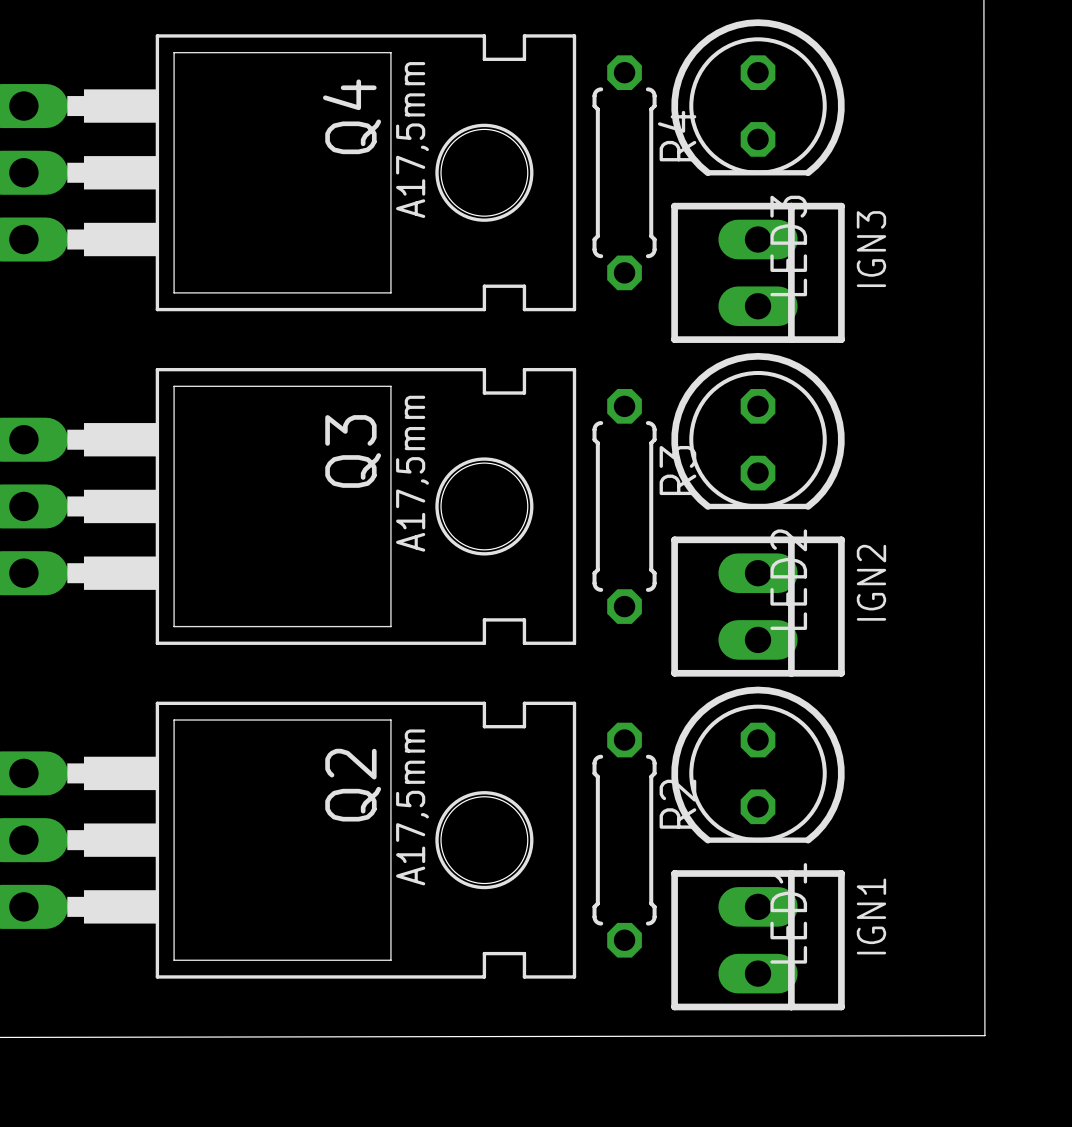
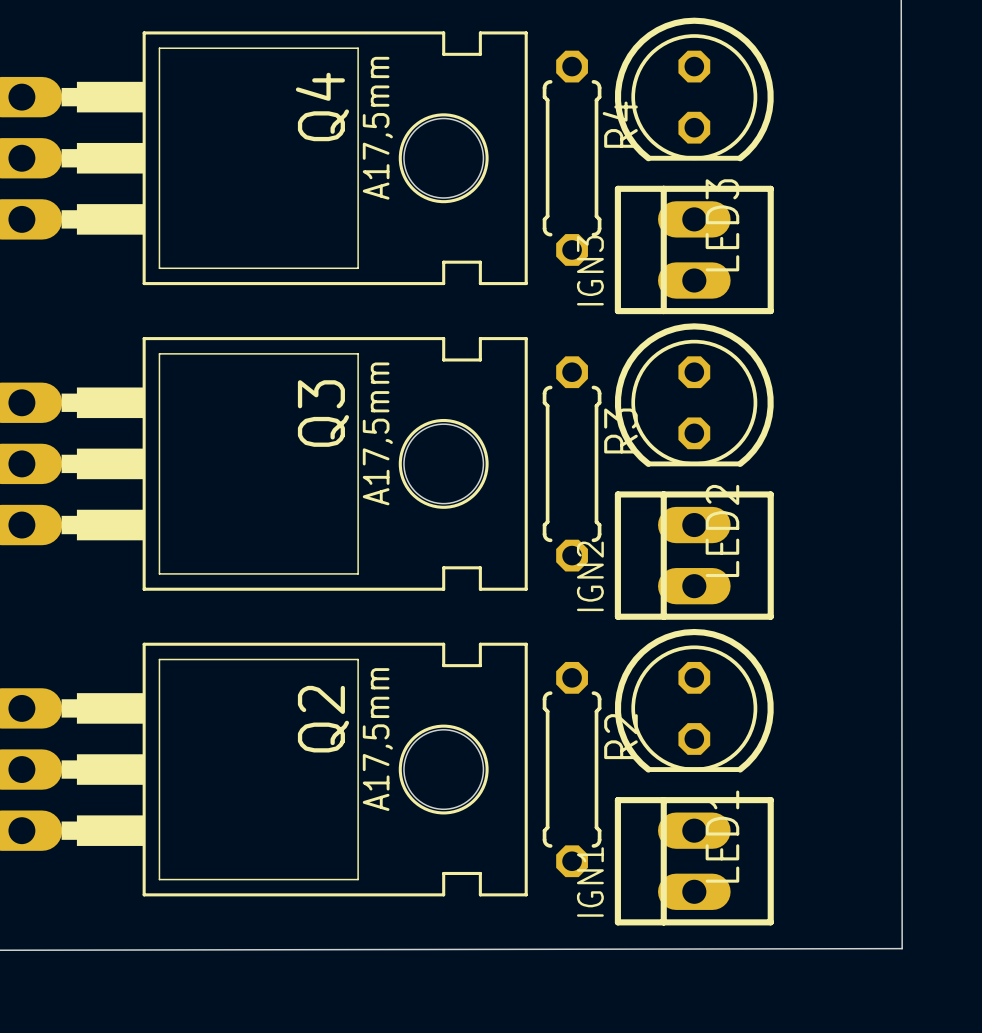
IGN3 rotation: 0° (758, 272) -> 180° (694, 249)
IGN2 rotation: 0° (758, 606) -> 180° (694, 555)
IGN1 rotation: 0° (758, 940) -> 180° (694, 861)

